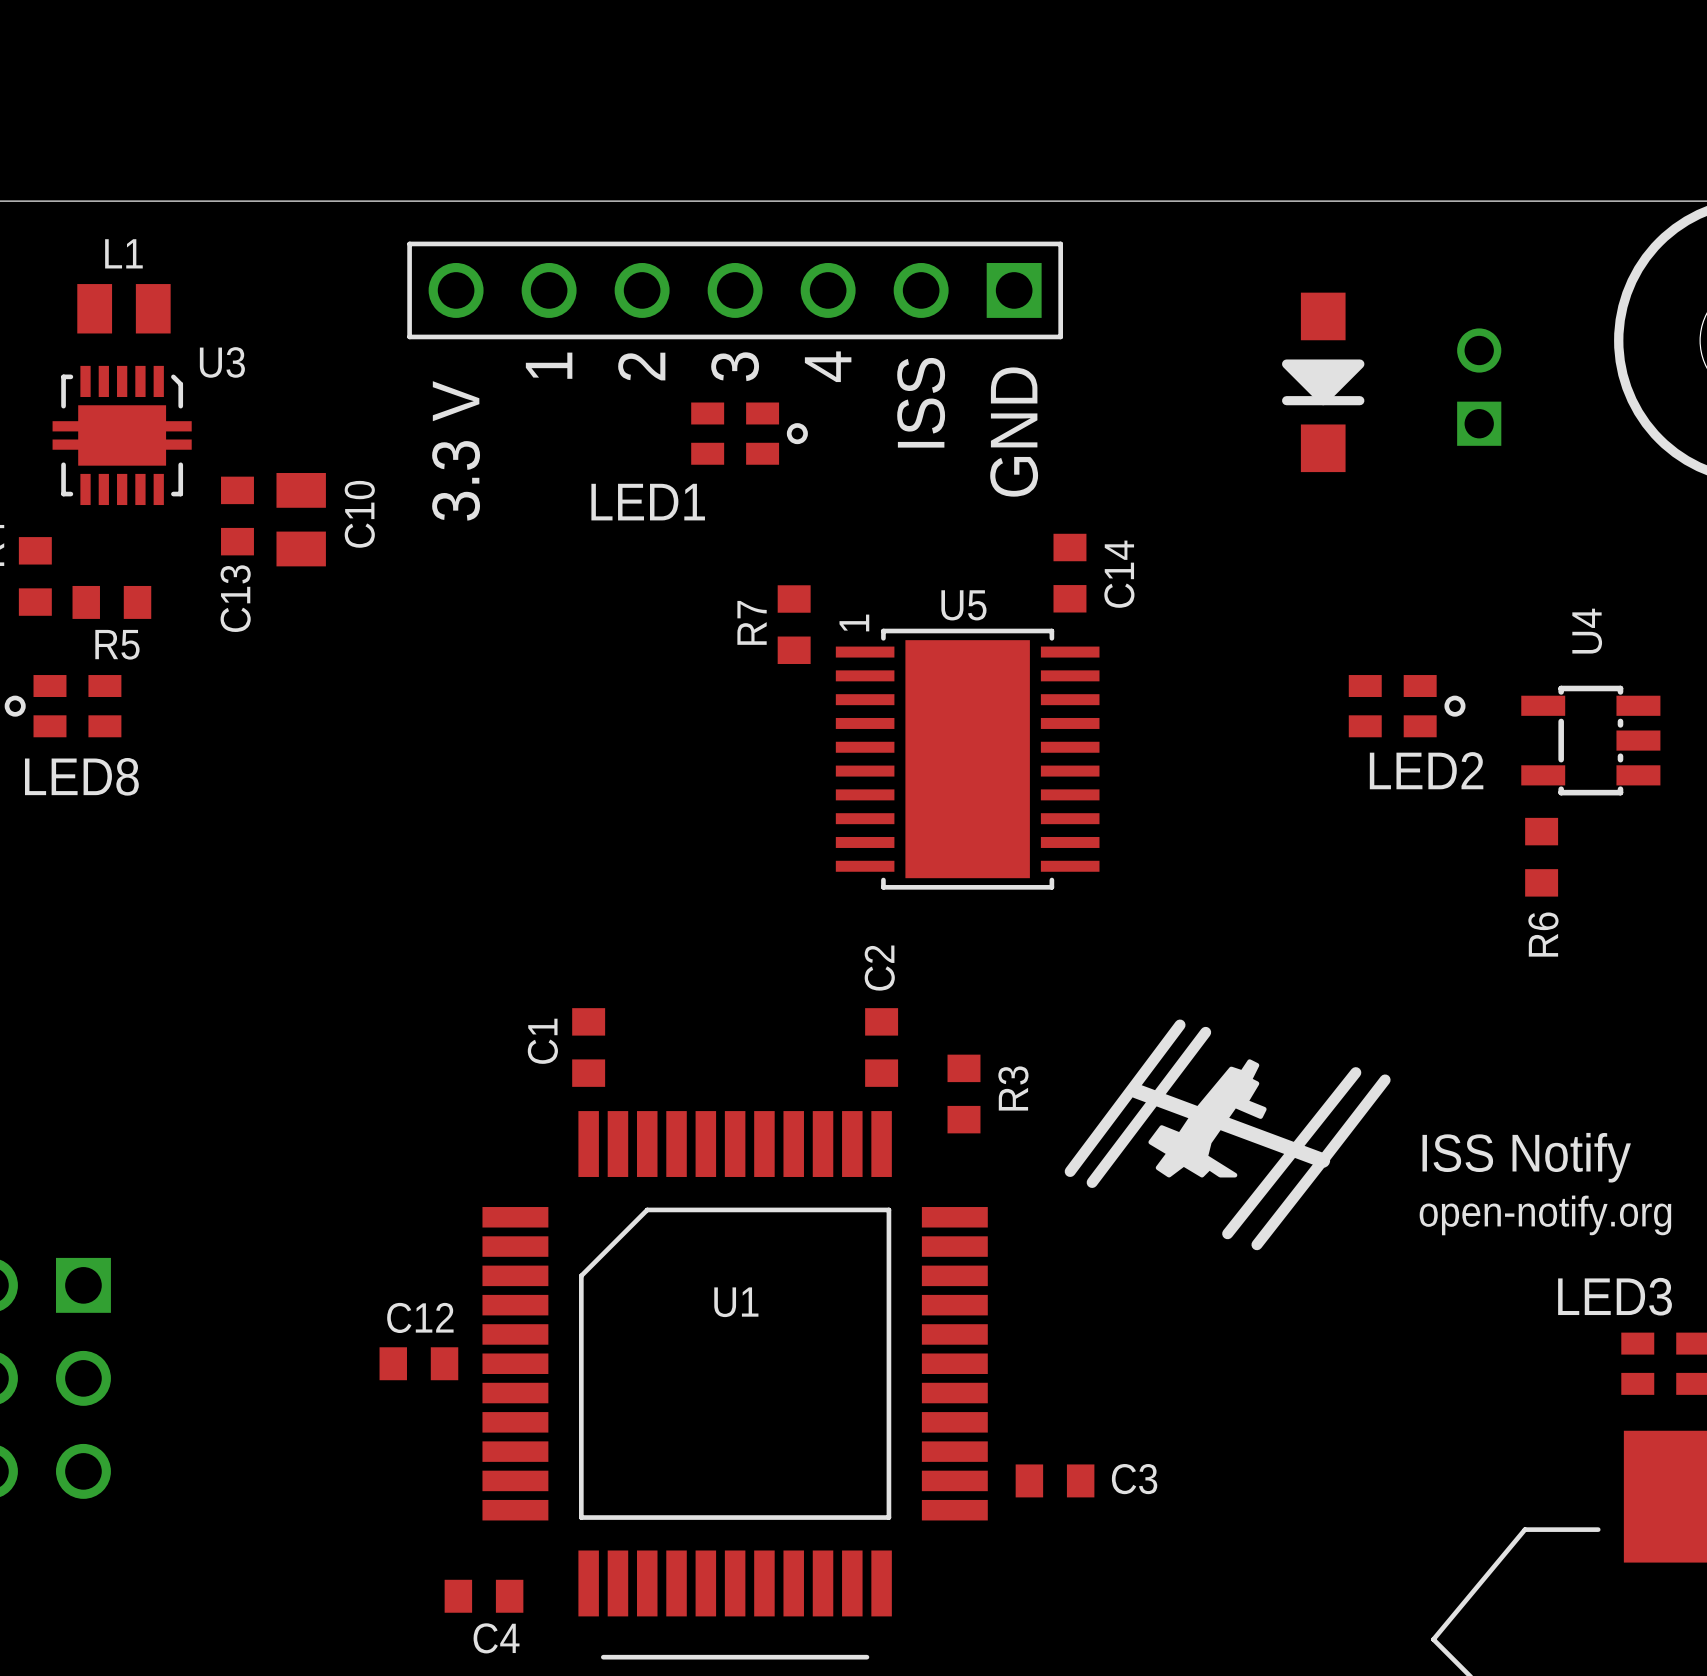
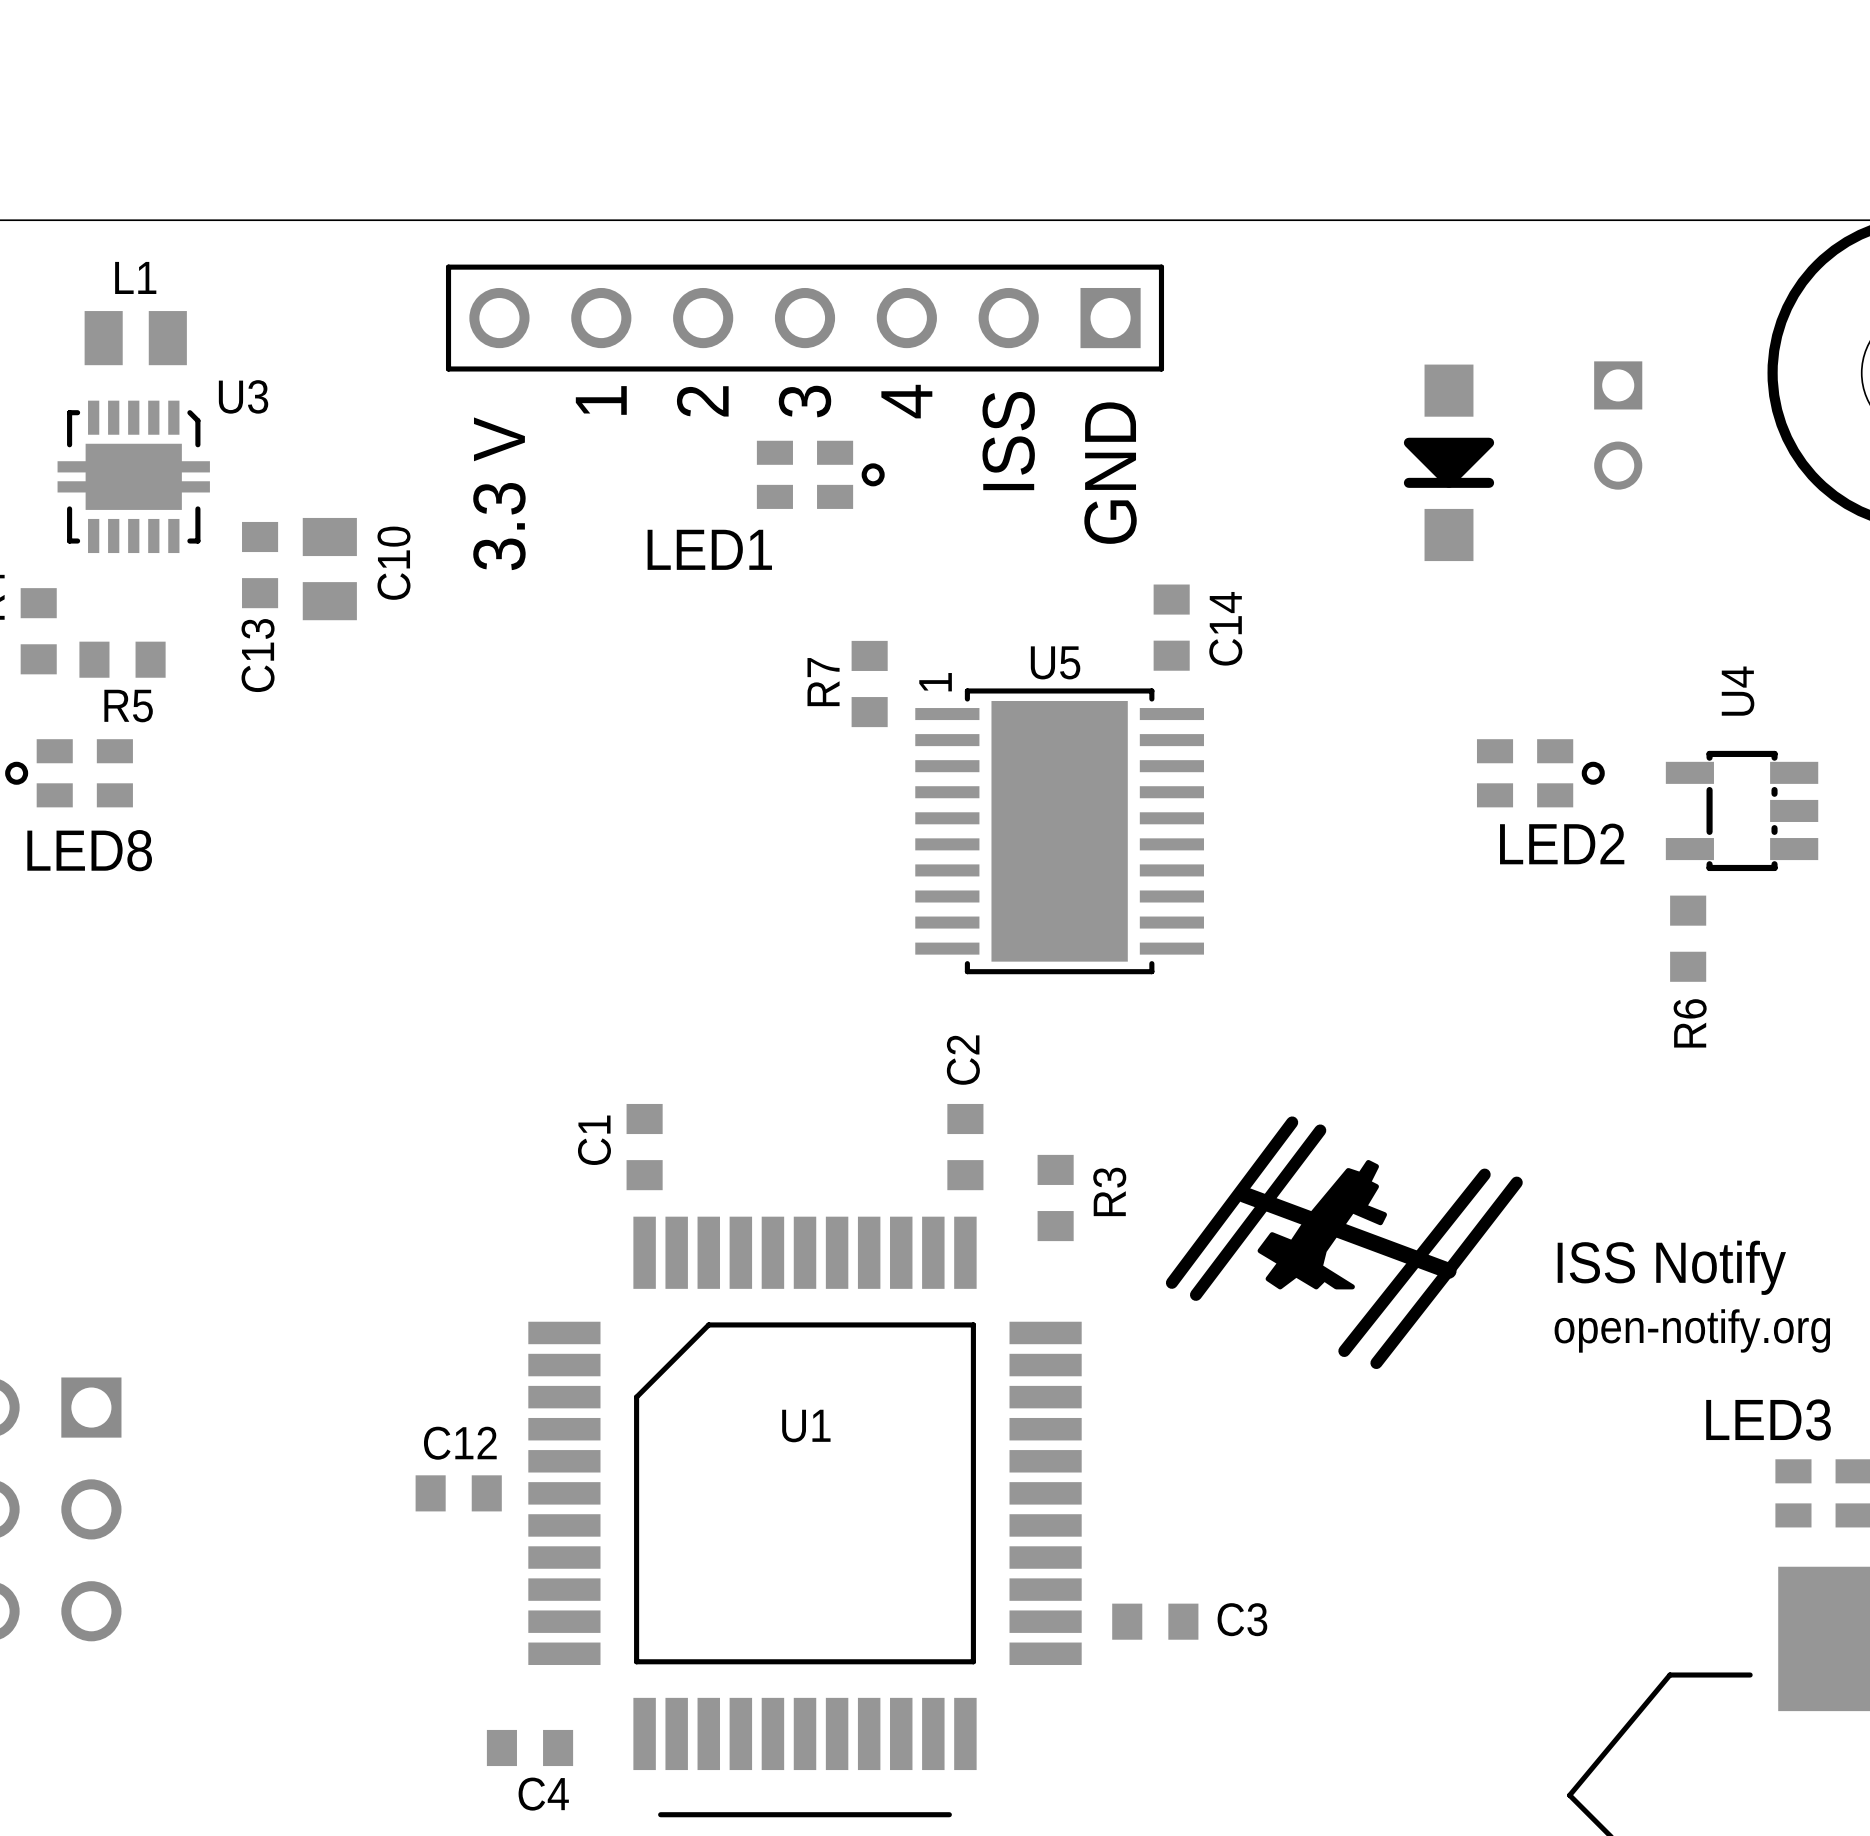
part position: (1323, 382) -> (1448, 462)
part rotation: 0° (1479, 387) -> 180° (1618, 425)

